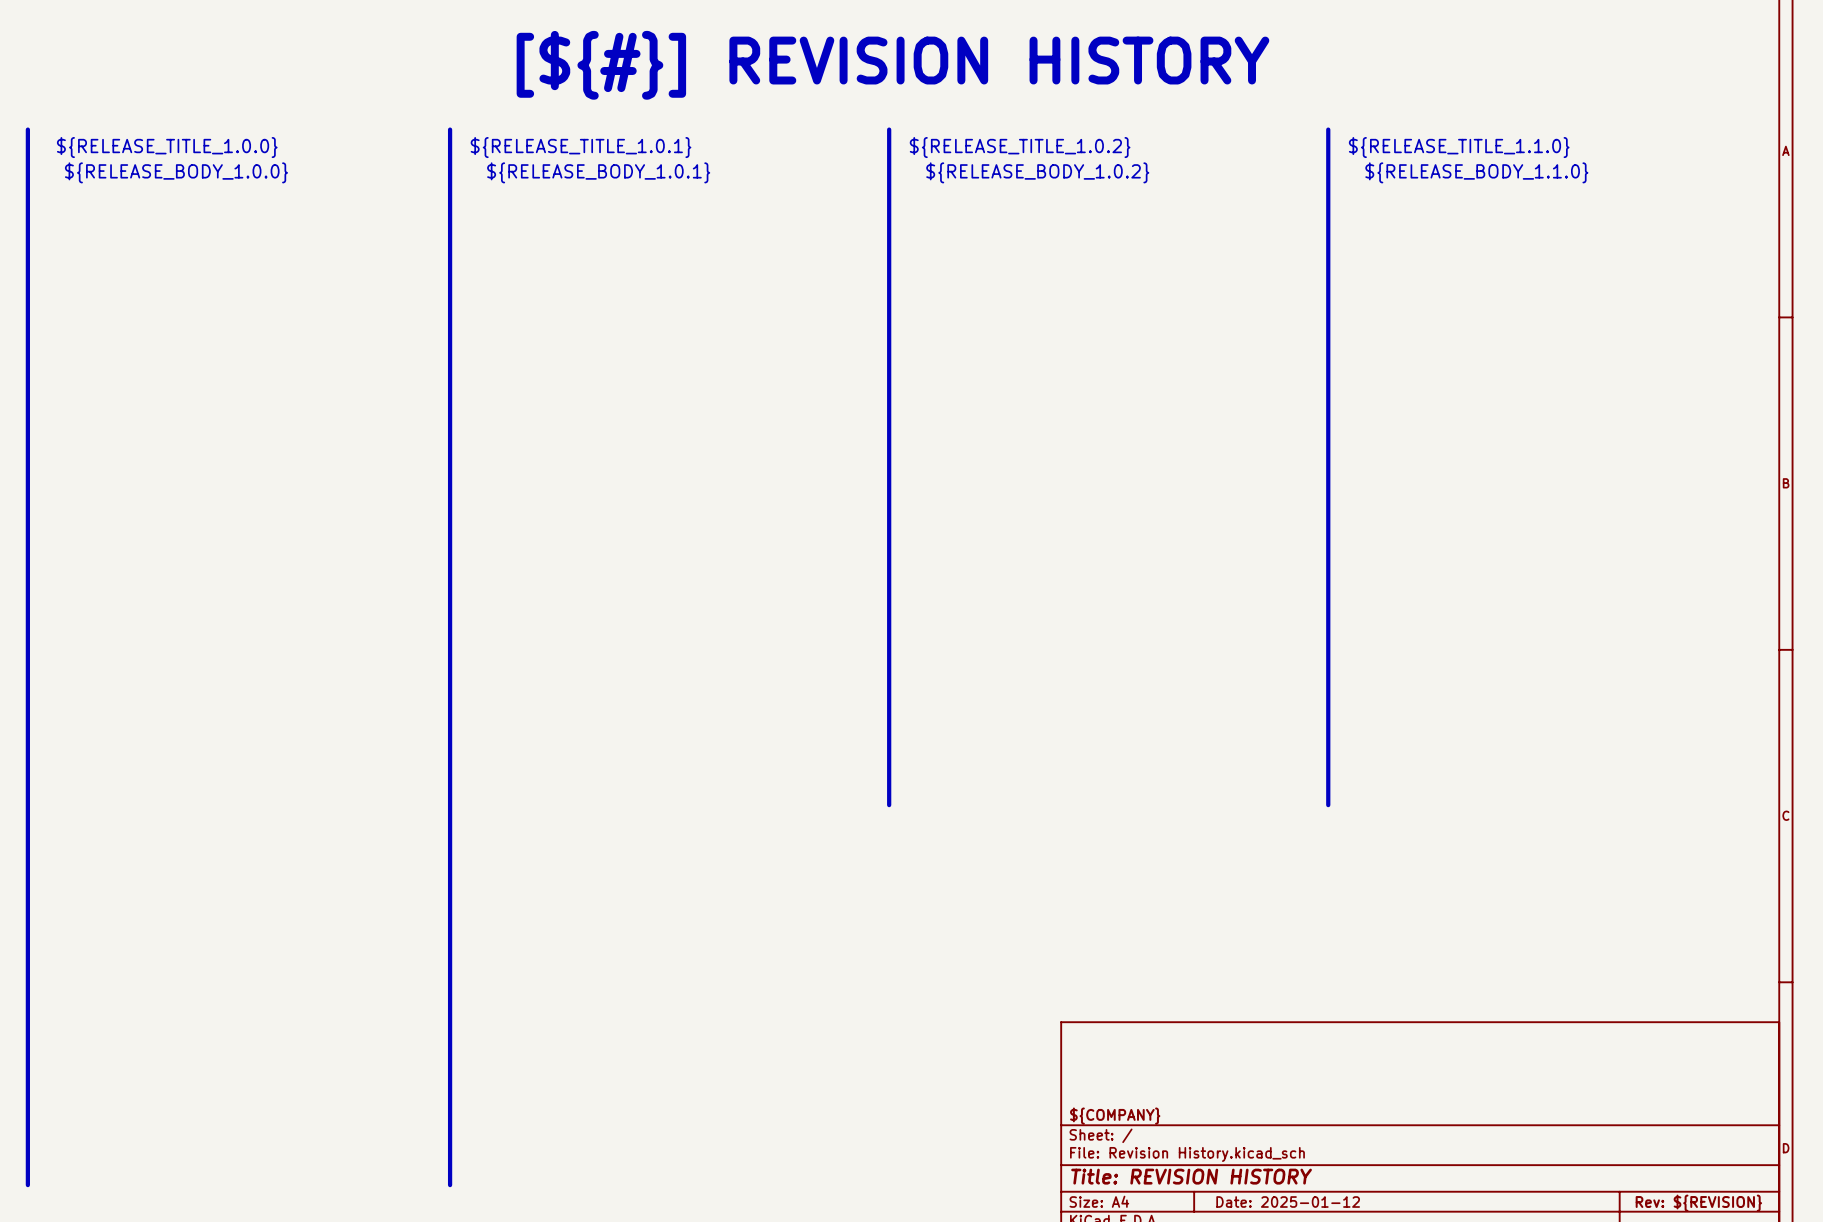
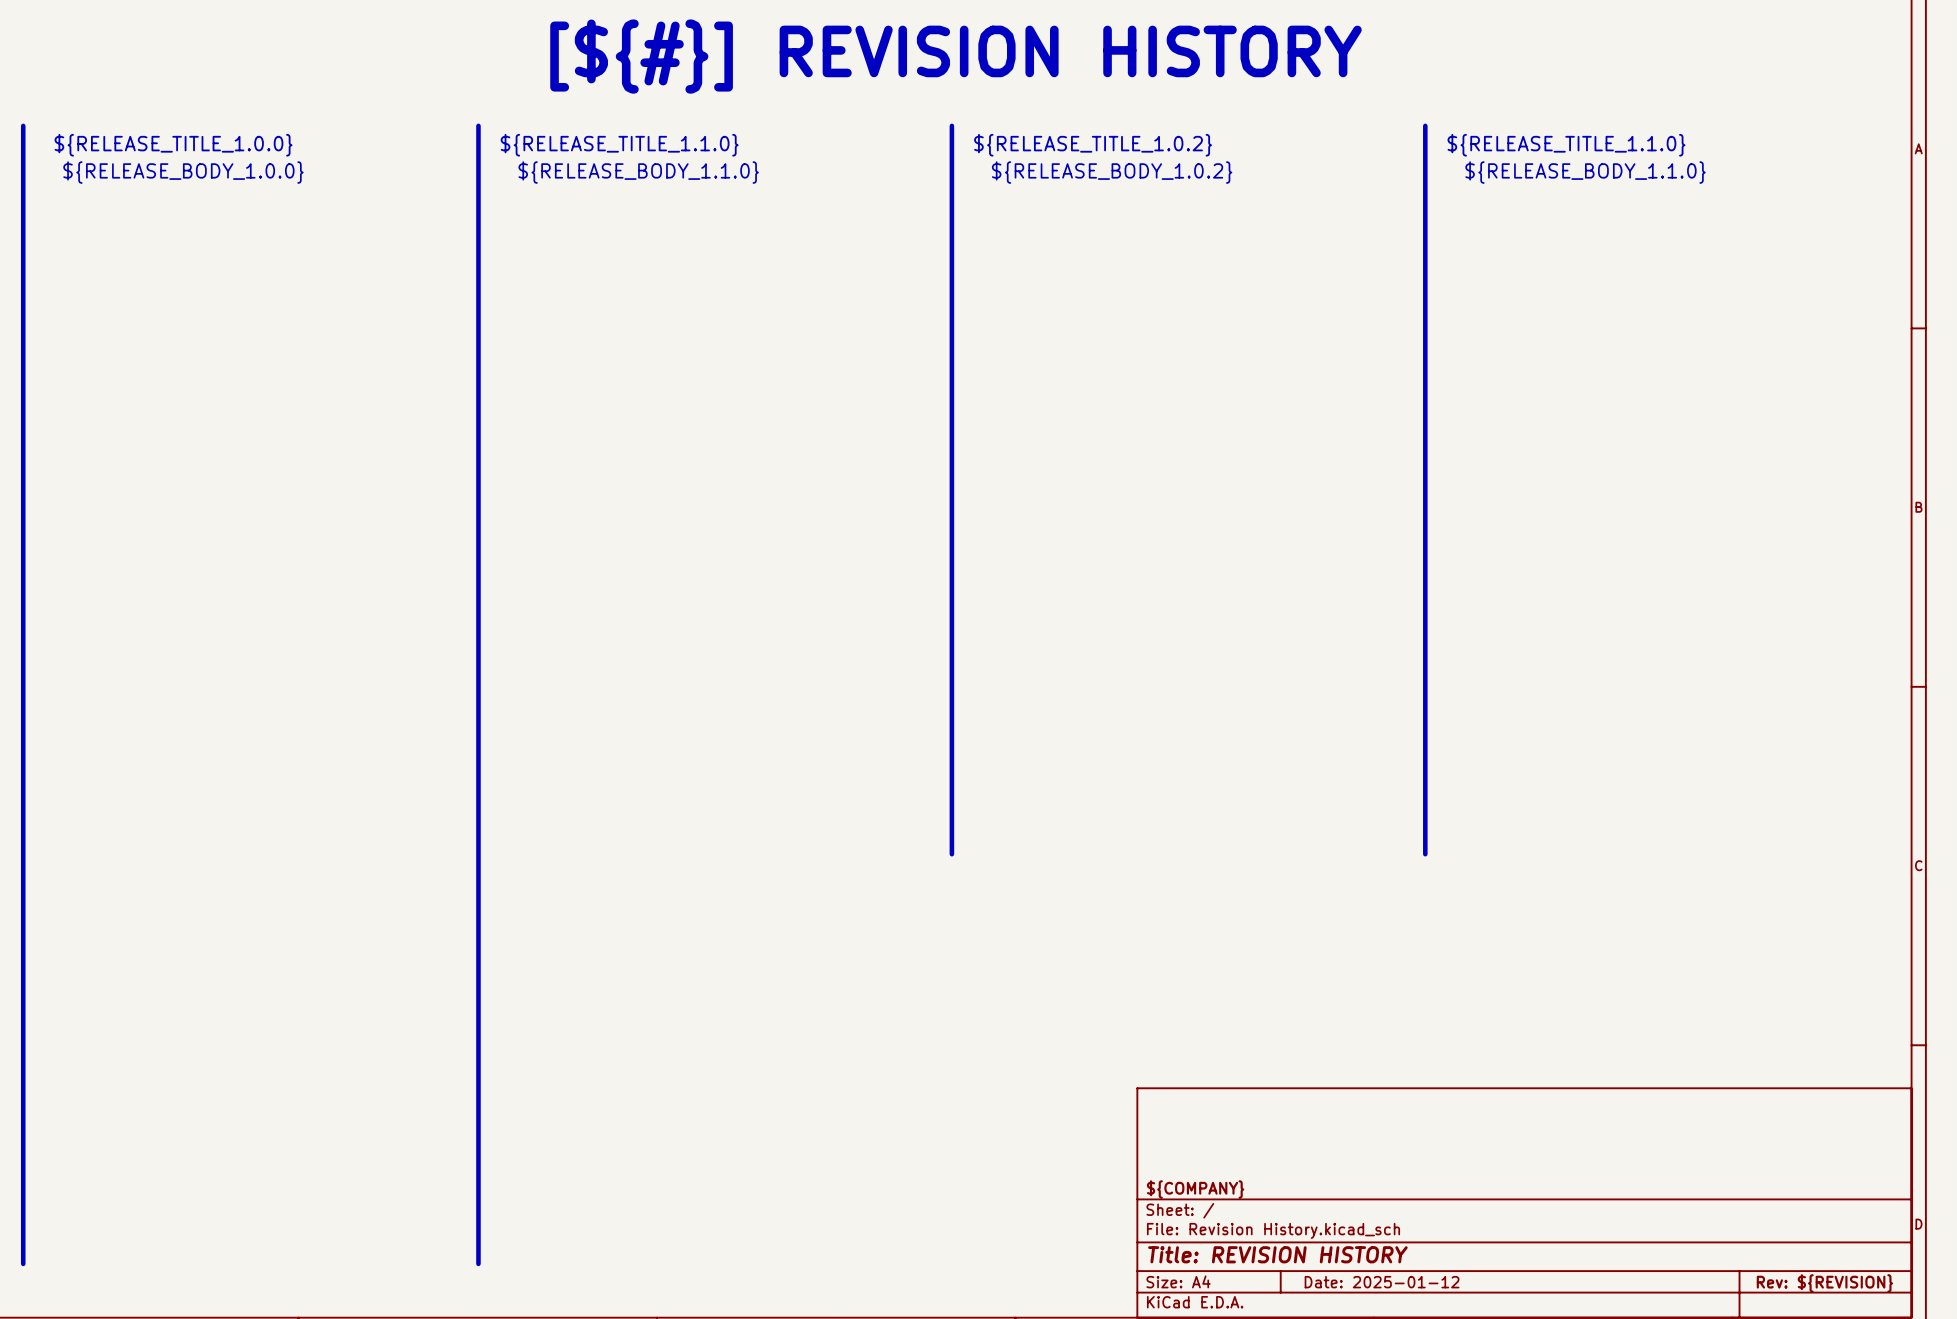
text: ${RELEASE_TITLE_1.0.1} (581, 147) -> ${RELEASE_TITLE_1.1.0} (619, 145)
text: ${RELEASE_BODY_1.0.1} (598, 172) -> ${RELEASE_BODY_1.1.0} (638, 172)

